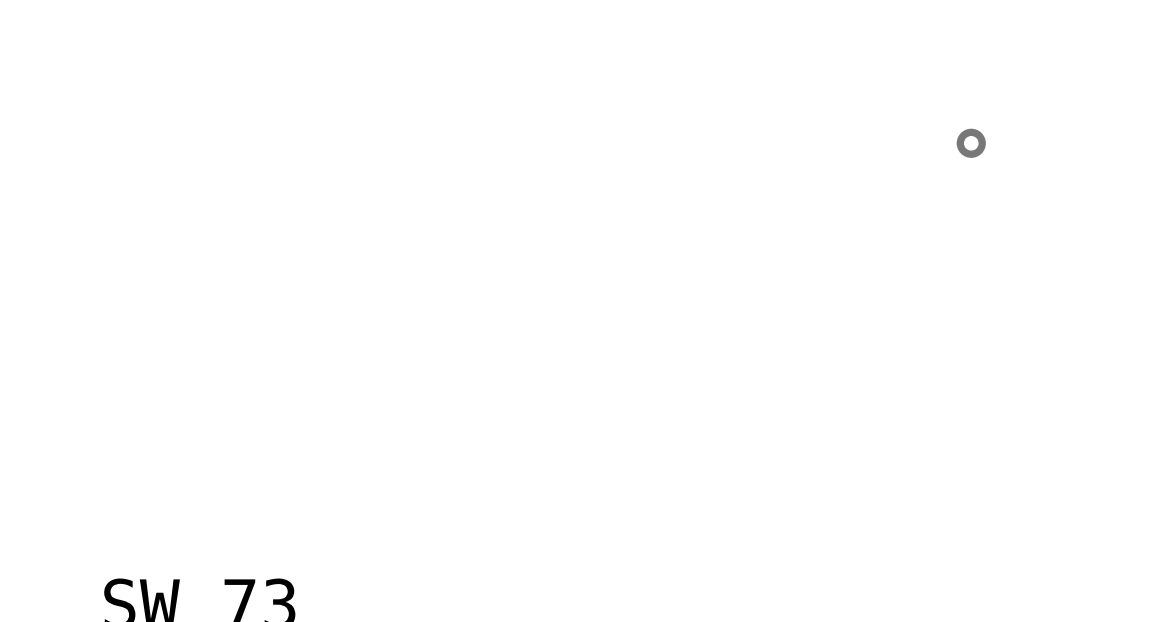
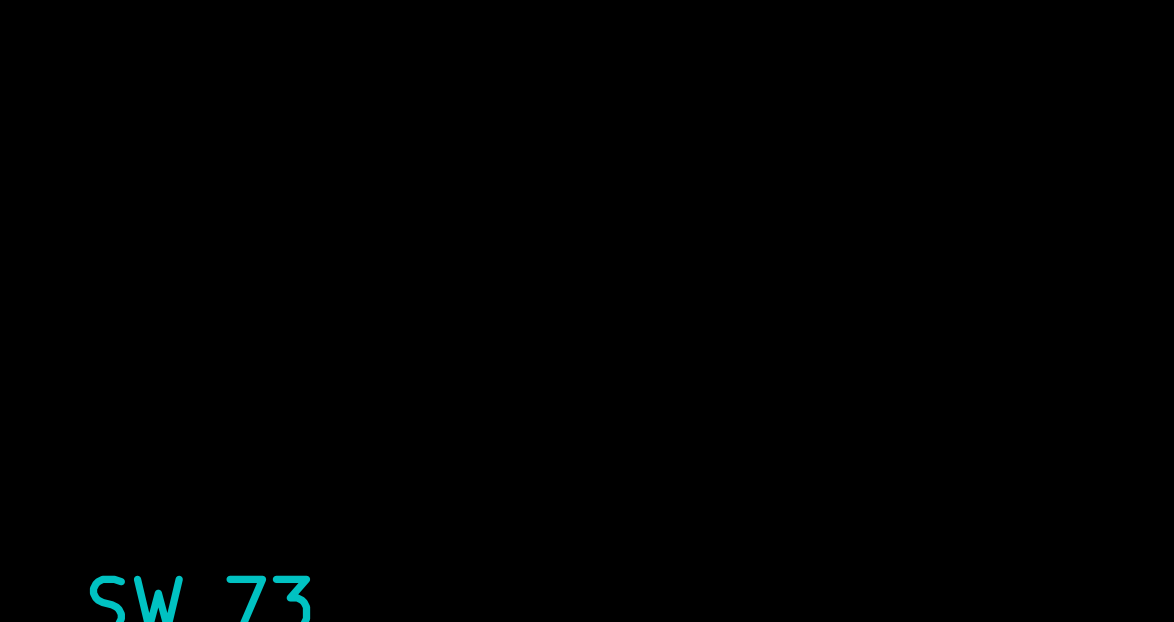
via: (971, 143) -> none

